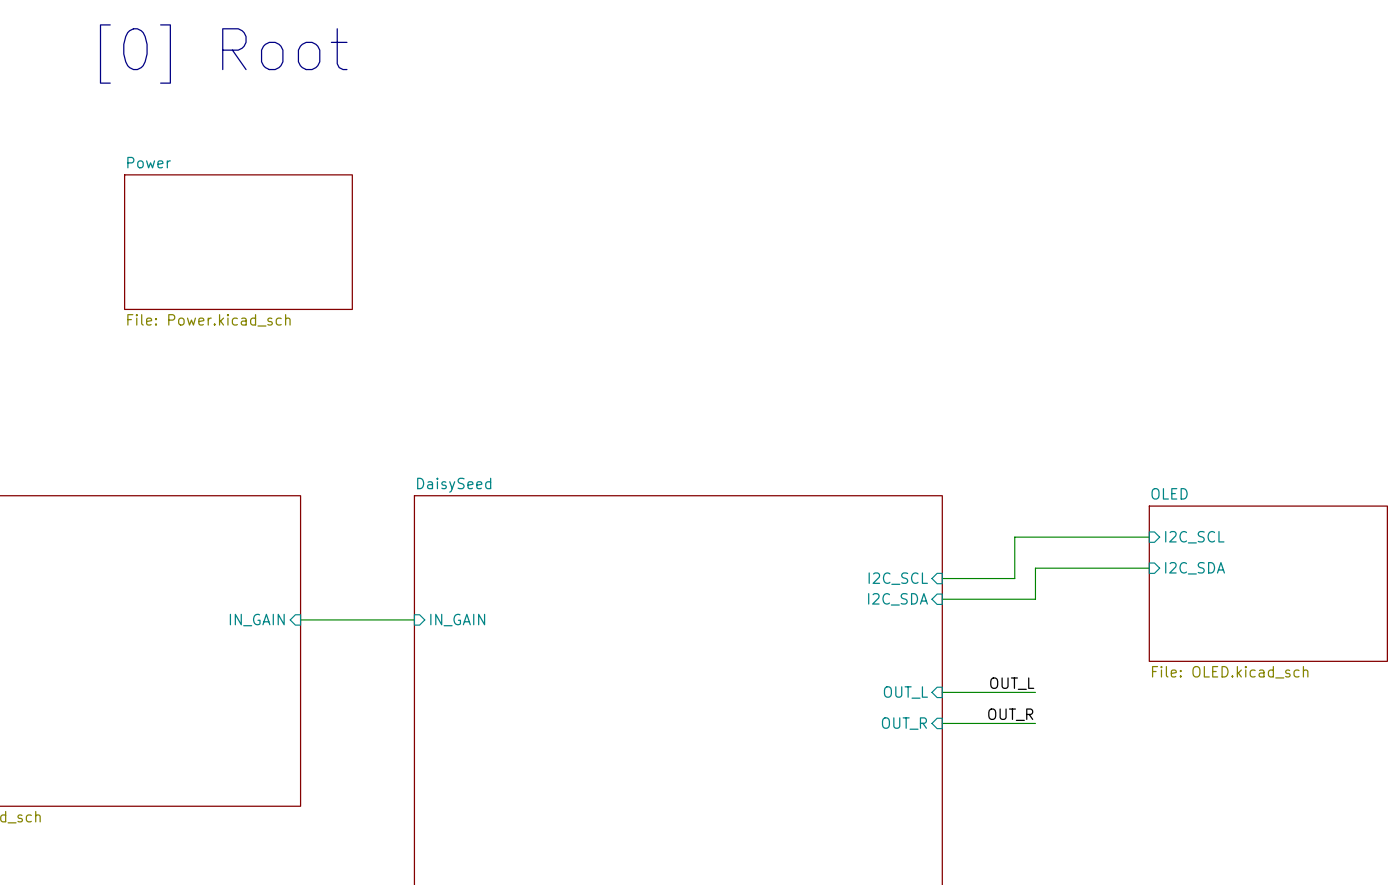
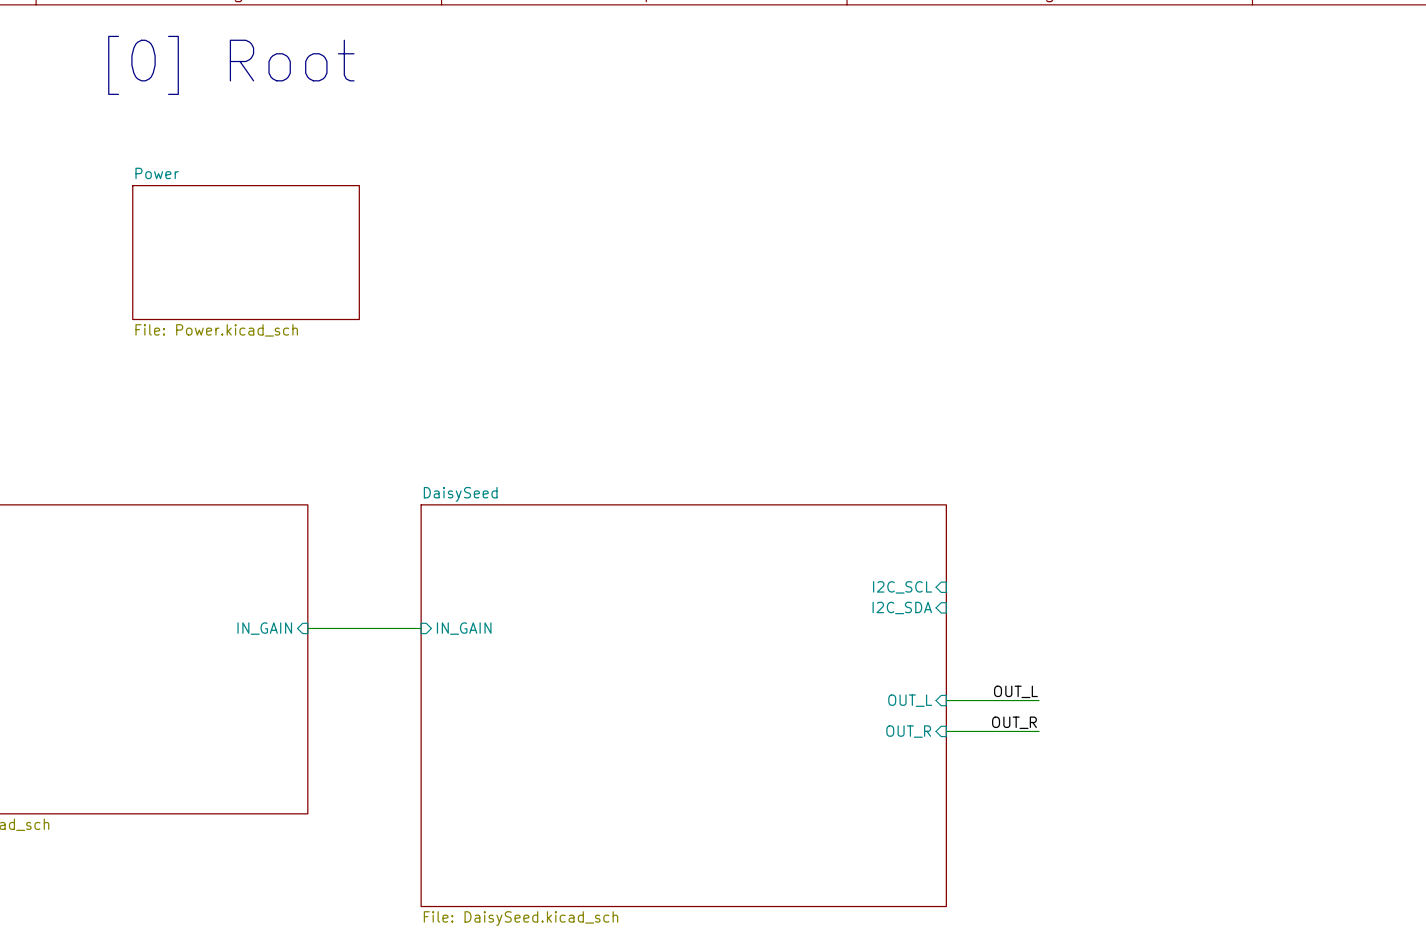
wire: (1149, 537) (1014, 537) (1014, 578) (942, 578) -> none
sheet pin: I2C_SCL (1194, 537) -> none
wire: (1149, 568) (1035, 568) (1035, 599) (942, 599) -> none
sheet pin: I2C_SDA (1195, 568) -> none
sheet OLED: File: OLED.kicad_sch (1268, 583) -> none

